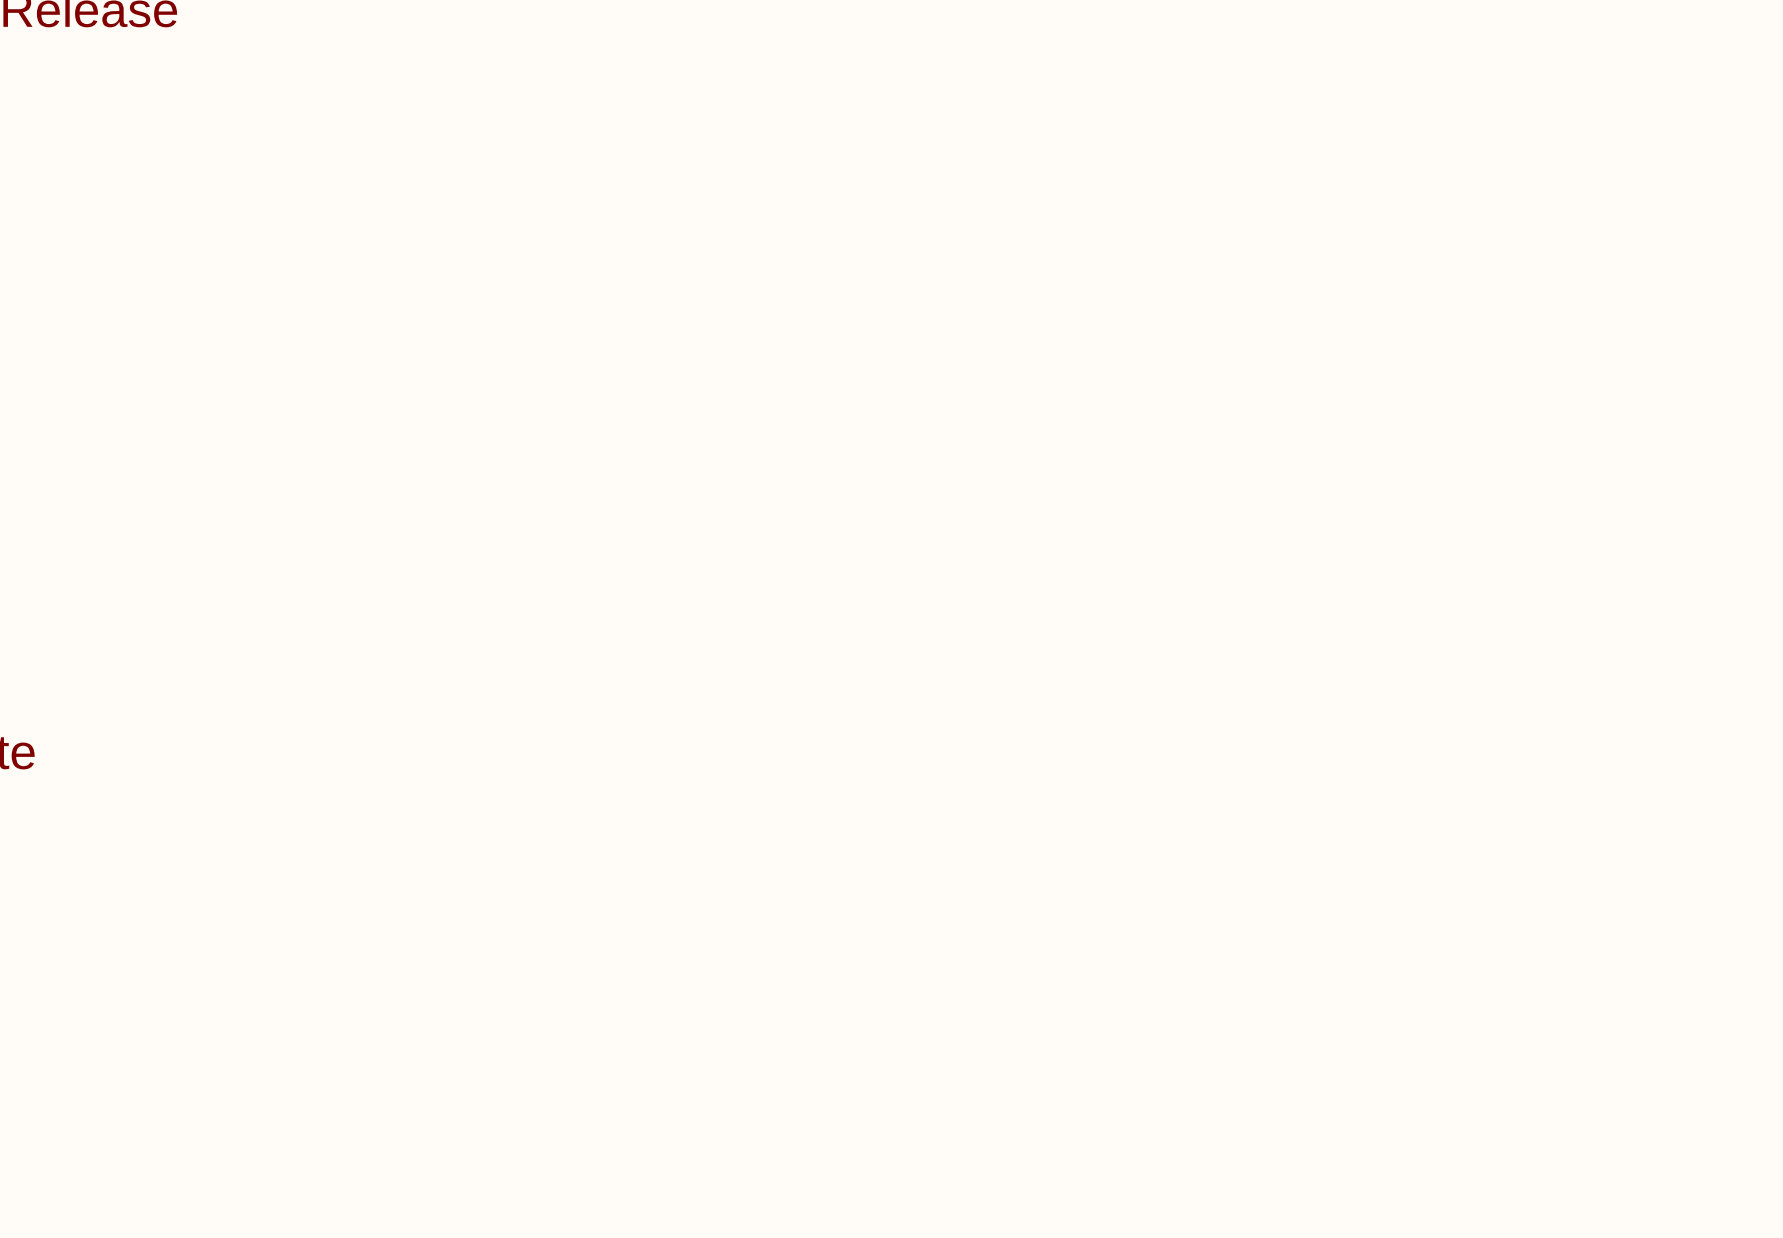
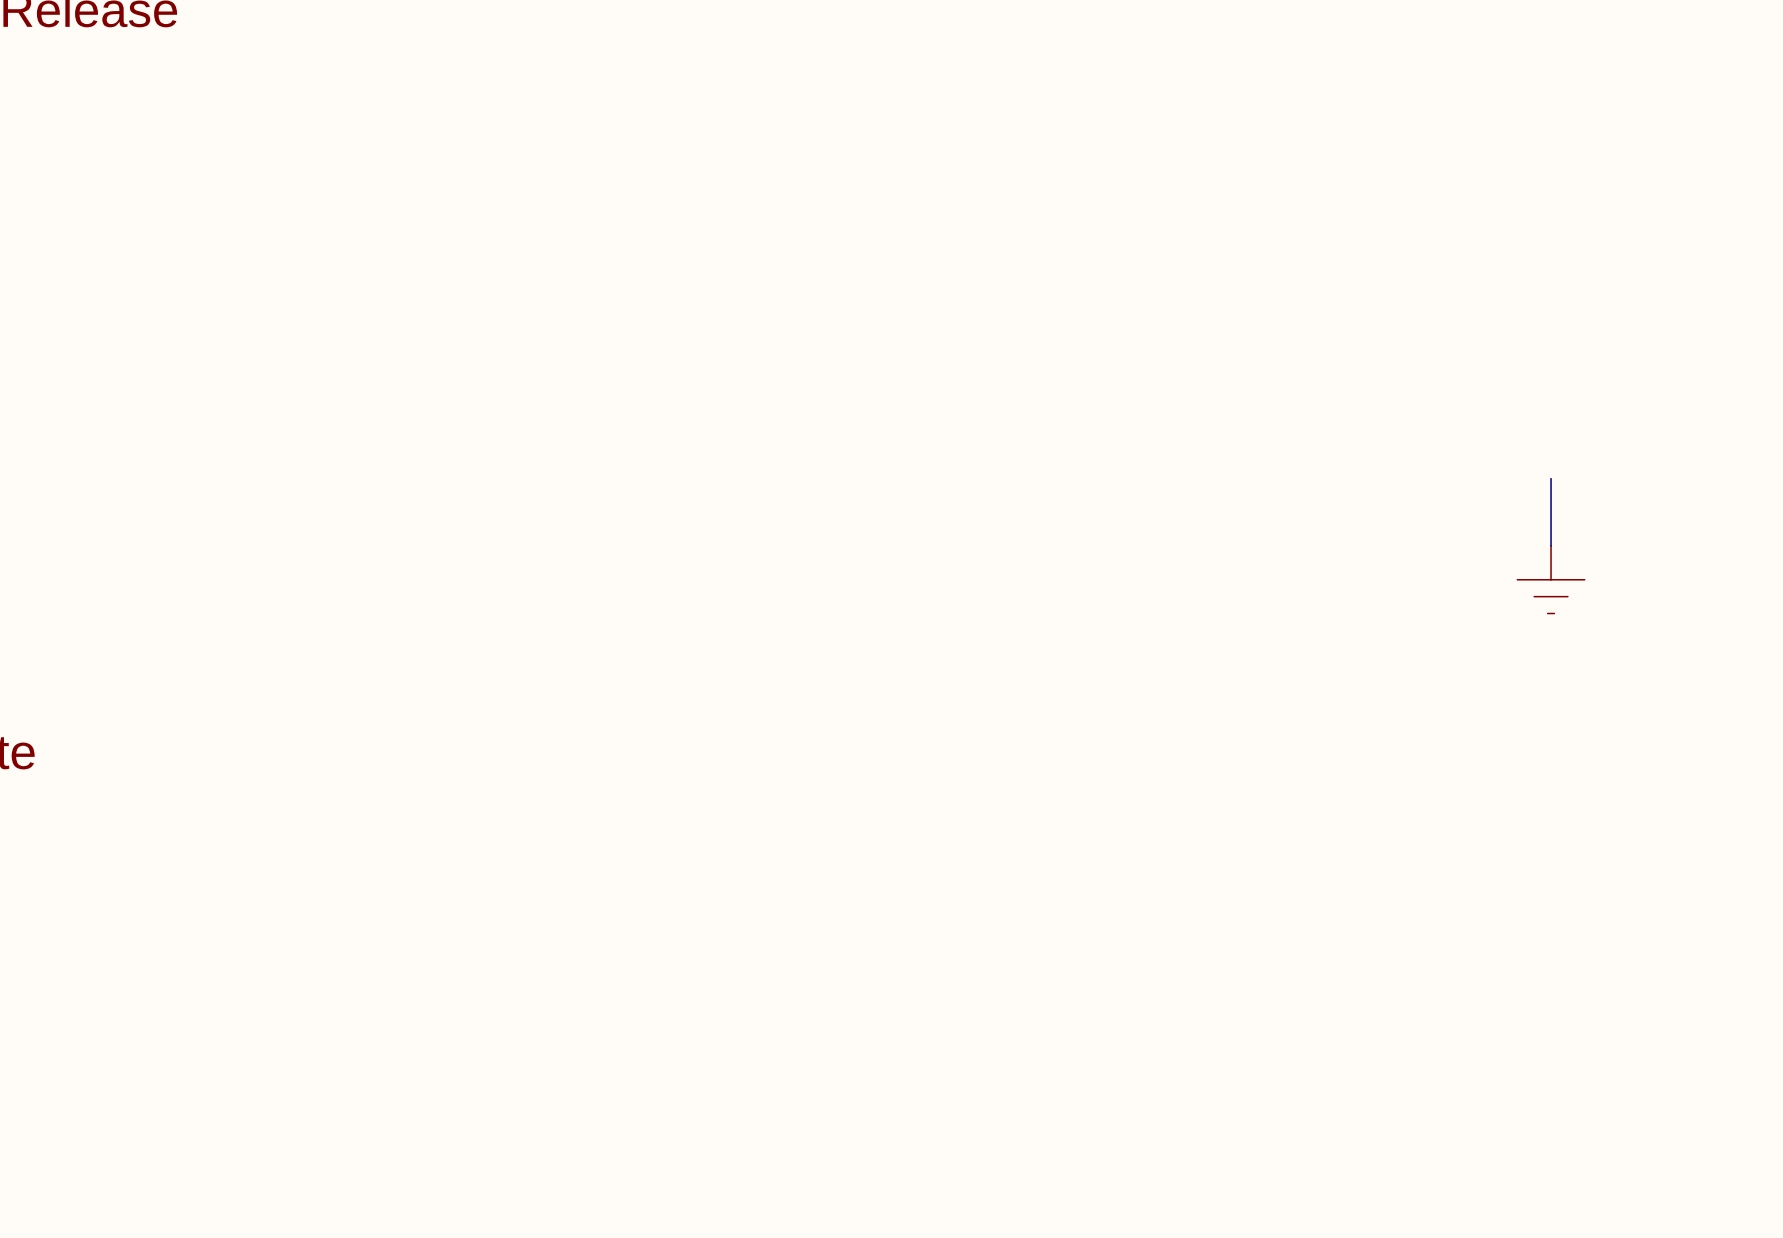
wire: none -> (1551, 478) (1551, 546)
power symbol: none -> (1551, 579)

